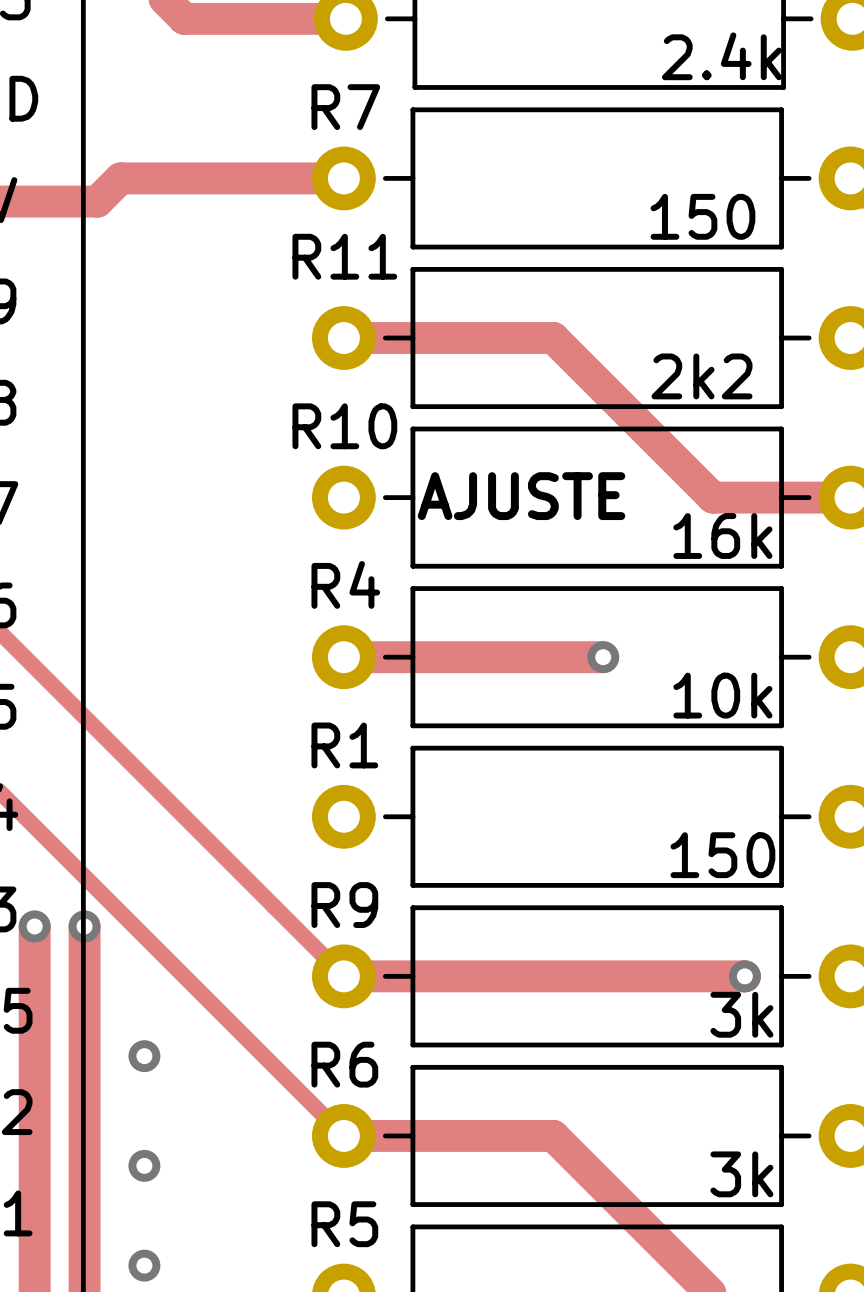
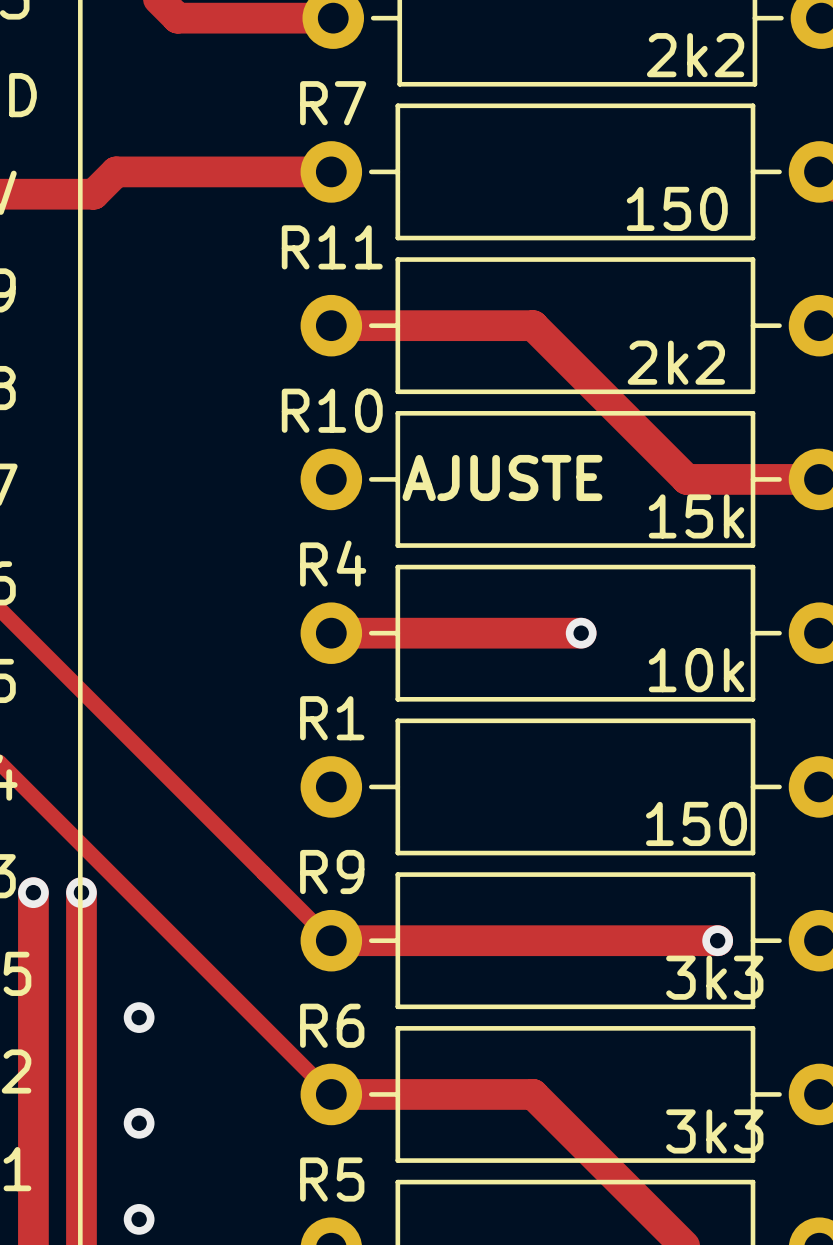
part value: 2.4k (721, 56) -> 2k2 (695, 55)
R10 value: 16k (722, 536) -> 15k (696, 516)
R9 value: 3k (741, 1014) -> 3k3 (714, 977)
R6 value: 3k (741, 1174) -> 3k3 (714, 1131)

